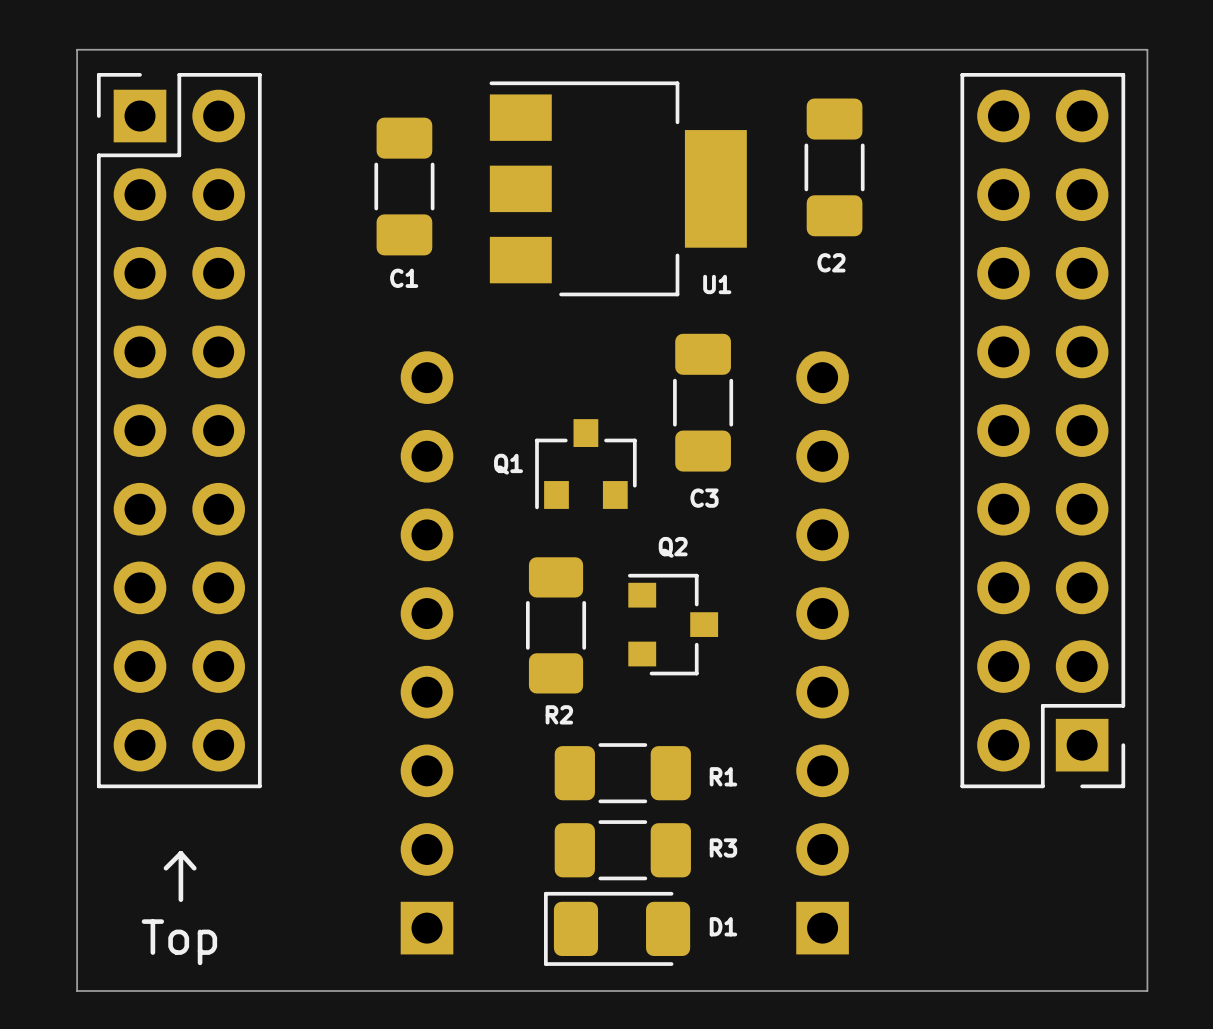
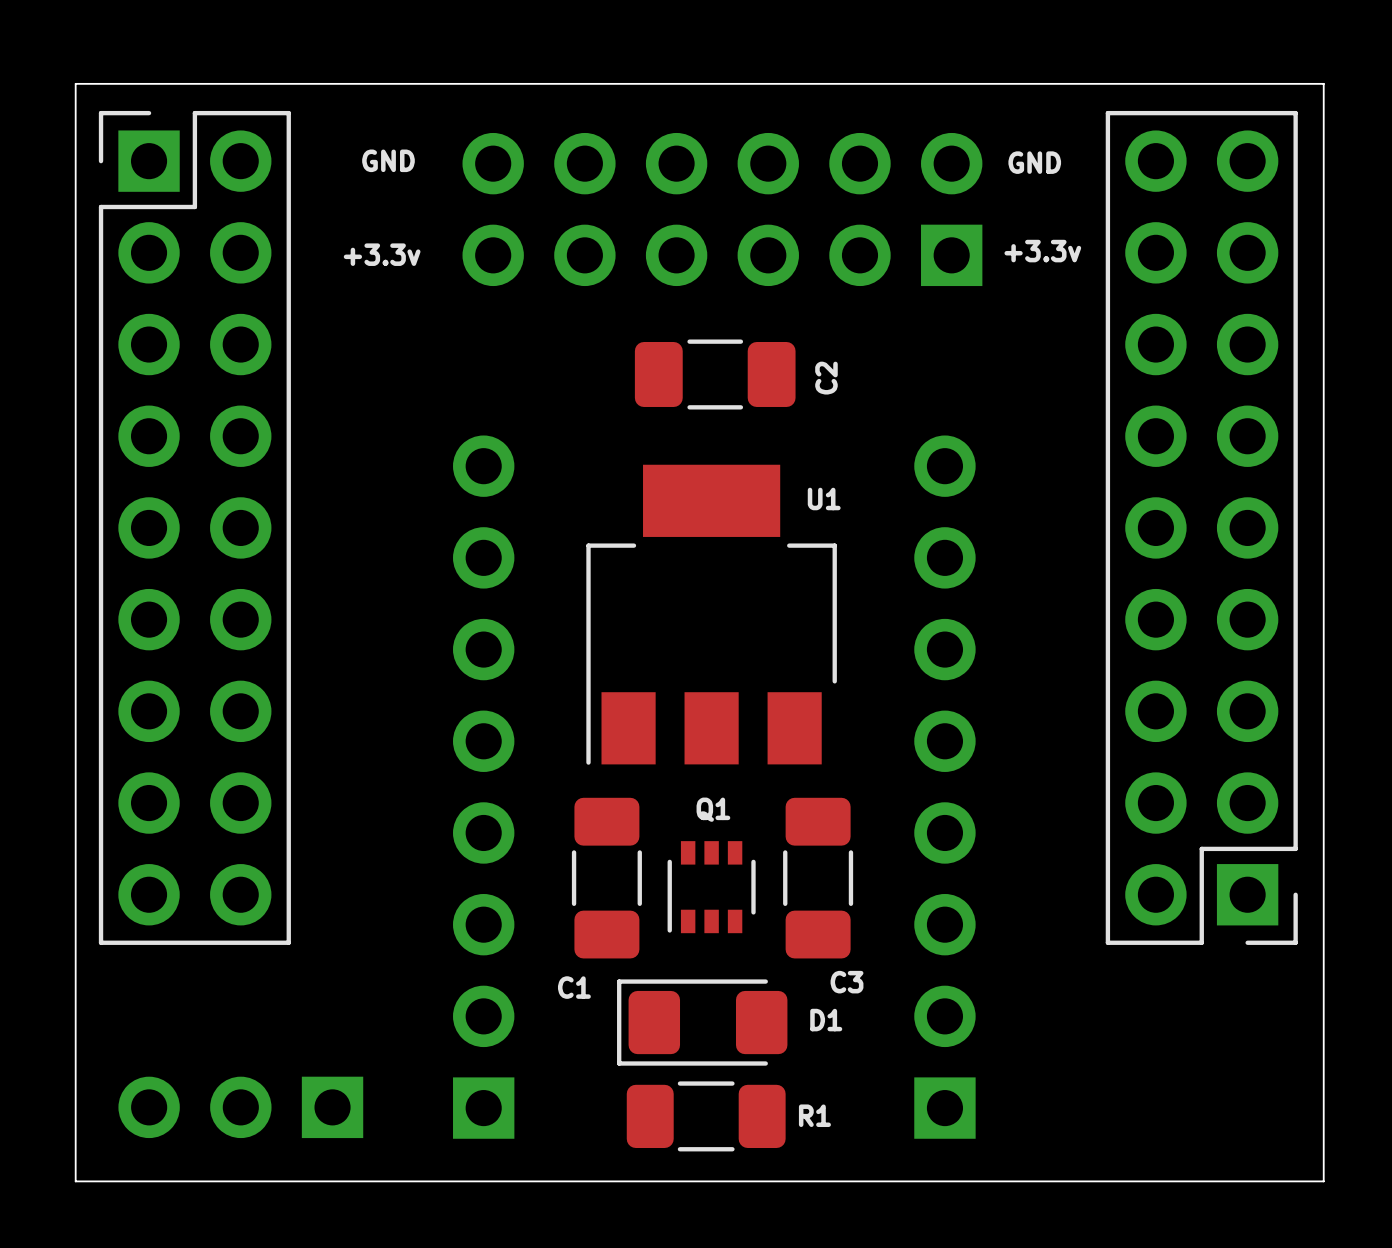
text: none -> GND (388, 160)
text: none -> GND (1034, 162)
part: none -> (722, 209)
C2 rotation: 0° (834, 167) -> 90° clockwise (715, 374)
C2 position: (834, 167) -> (715, 374)
C1 position: (404, 186) -> (606, 878)
U1 rotation: 0° (618, 188) -> 90° counterclockwise (711, 614)
U1 position: (618, 188) -> (711, 614)
text: none -> +3.3v (1042, 251)
text: none -> +3.3v (382, 254)
C2 name position: C2 (831, 262) -> C2 (826, 378)
C1 name position: C1 (404, 278) -> C1 (574, 987)
C3 position: (703, 402) -> (818, 878)
Q1 footprint: [535, 419, 637, 510] -> [667, 841, 756, 934]
Q1 name position: Q1 (508, 464) -> Q1 (713, 809)
C3 name position: C3 (704, 498) -> C3 (846, 982)
Q2: (673, 624) -> none
R2: (556, 625) -> none
R1 position: (622, 773) -> (706, 1116)
R1 name position: R1 (723, 776) -> R1 (814, 1115)
R3: (622, 850) -> none
line: (180, 853) (194, 868) -> none
line: (180, 853) (165, 868) -> none
line: (180, 853) (180, 899) -> none
part: none -> (240, 1107)
D1 position: (617, 928) -> (702, 1022)
text: Top (179, 942) -> none

